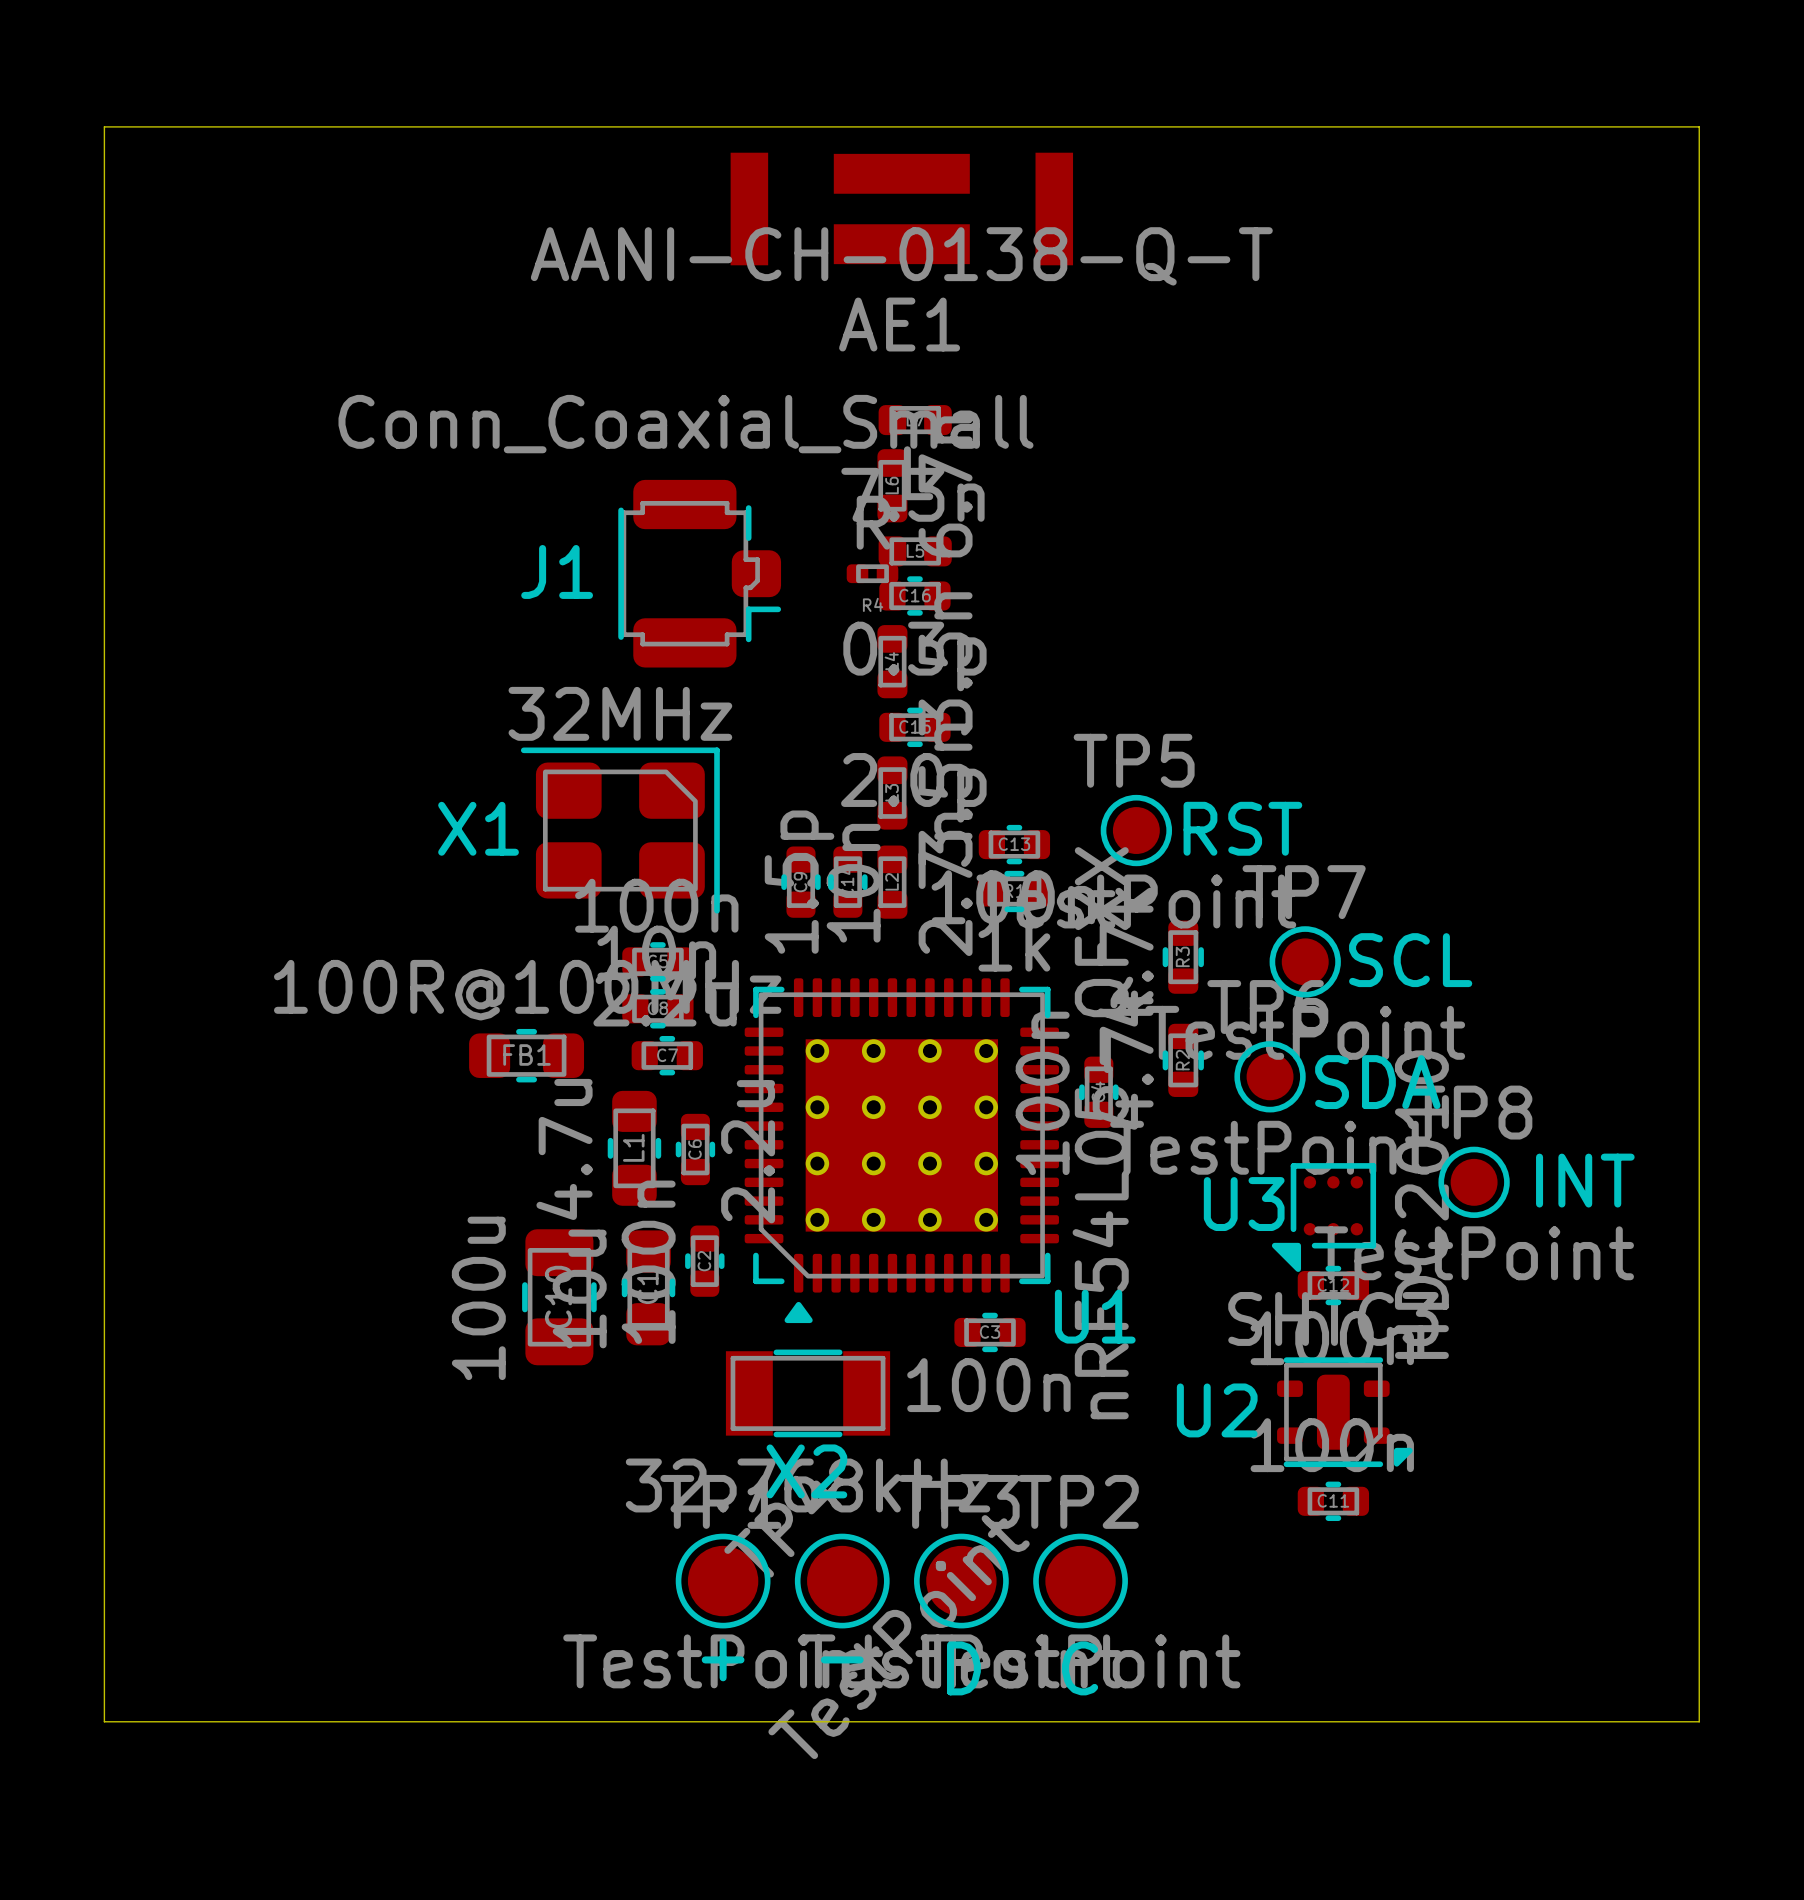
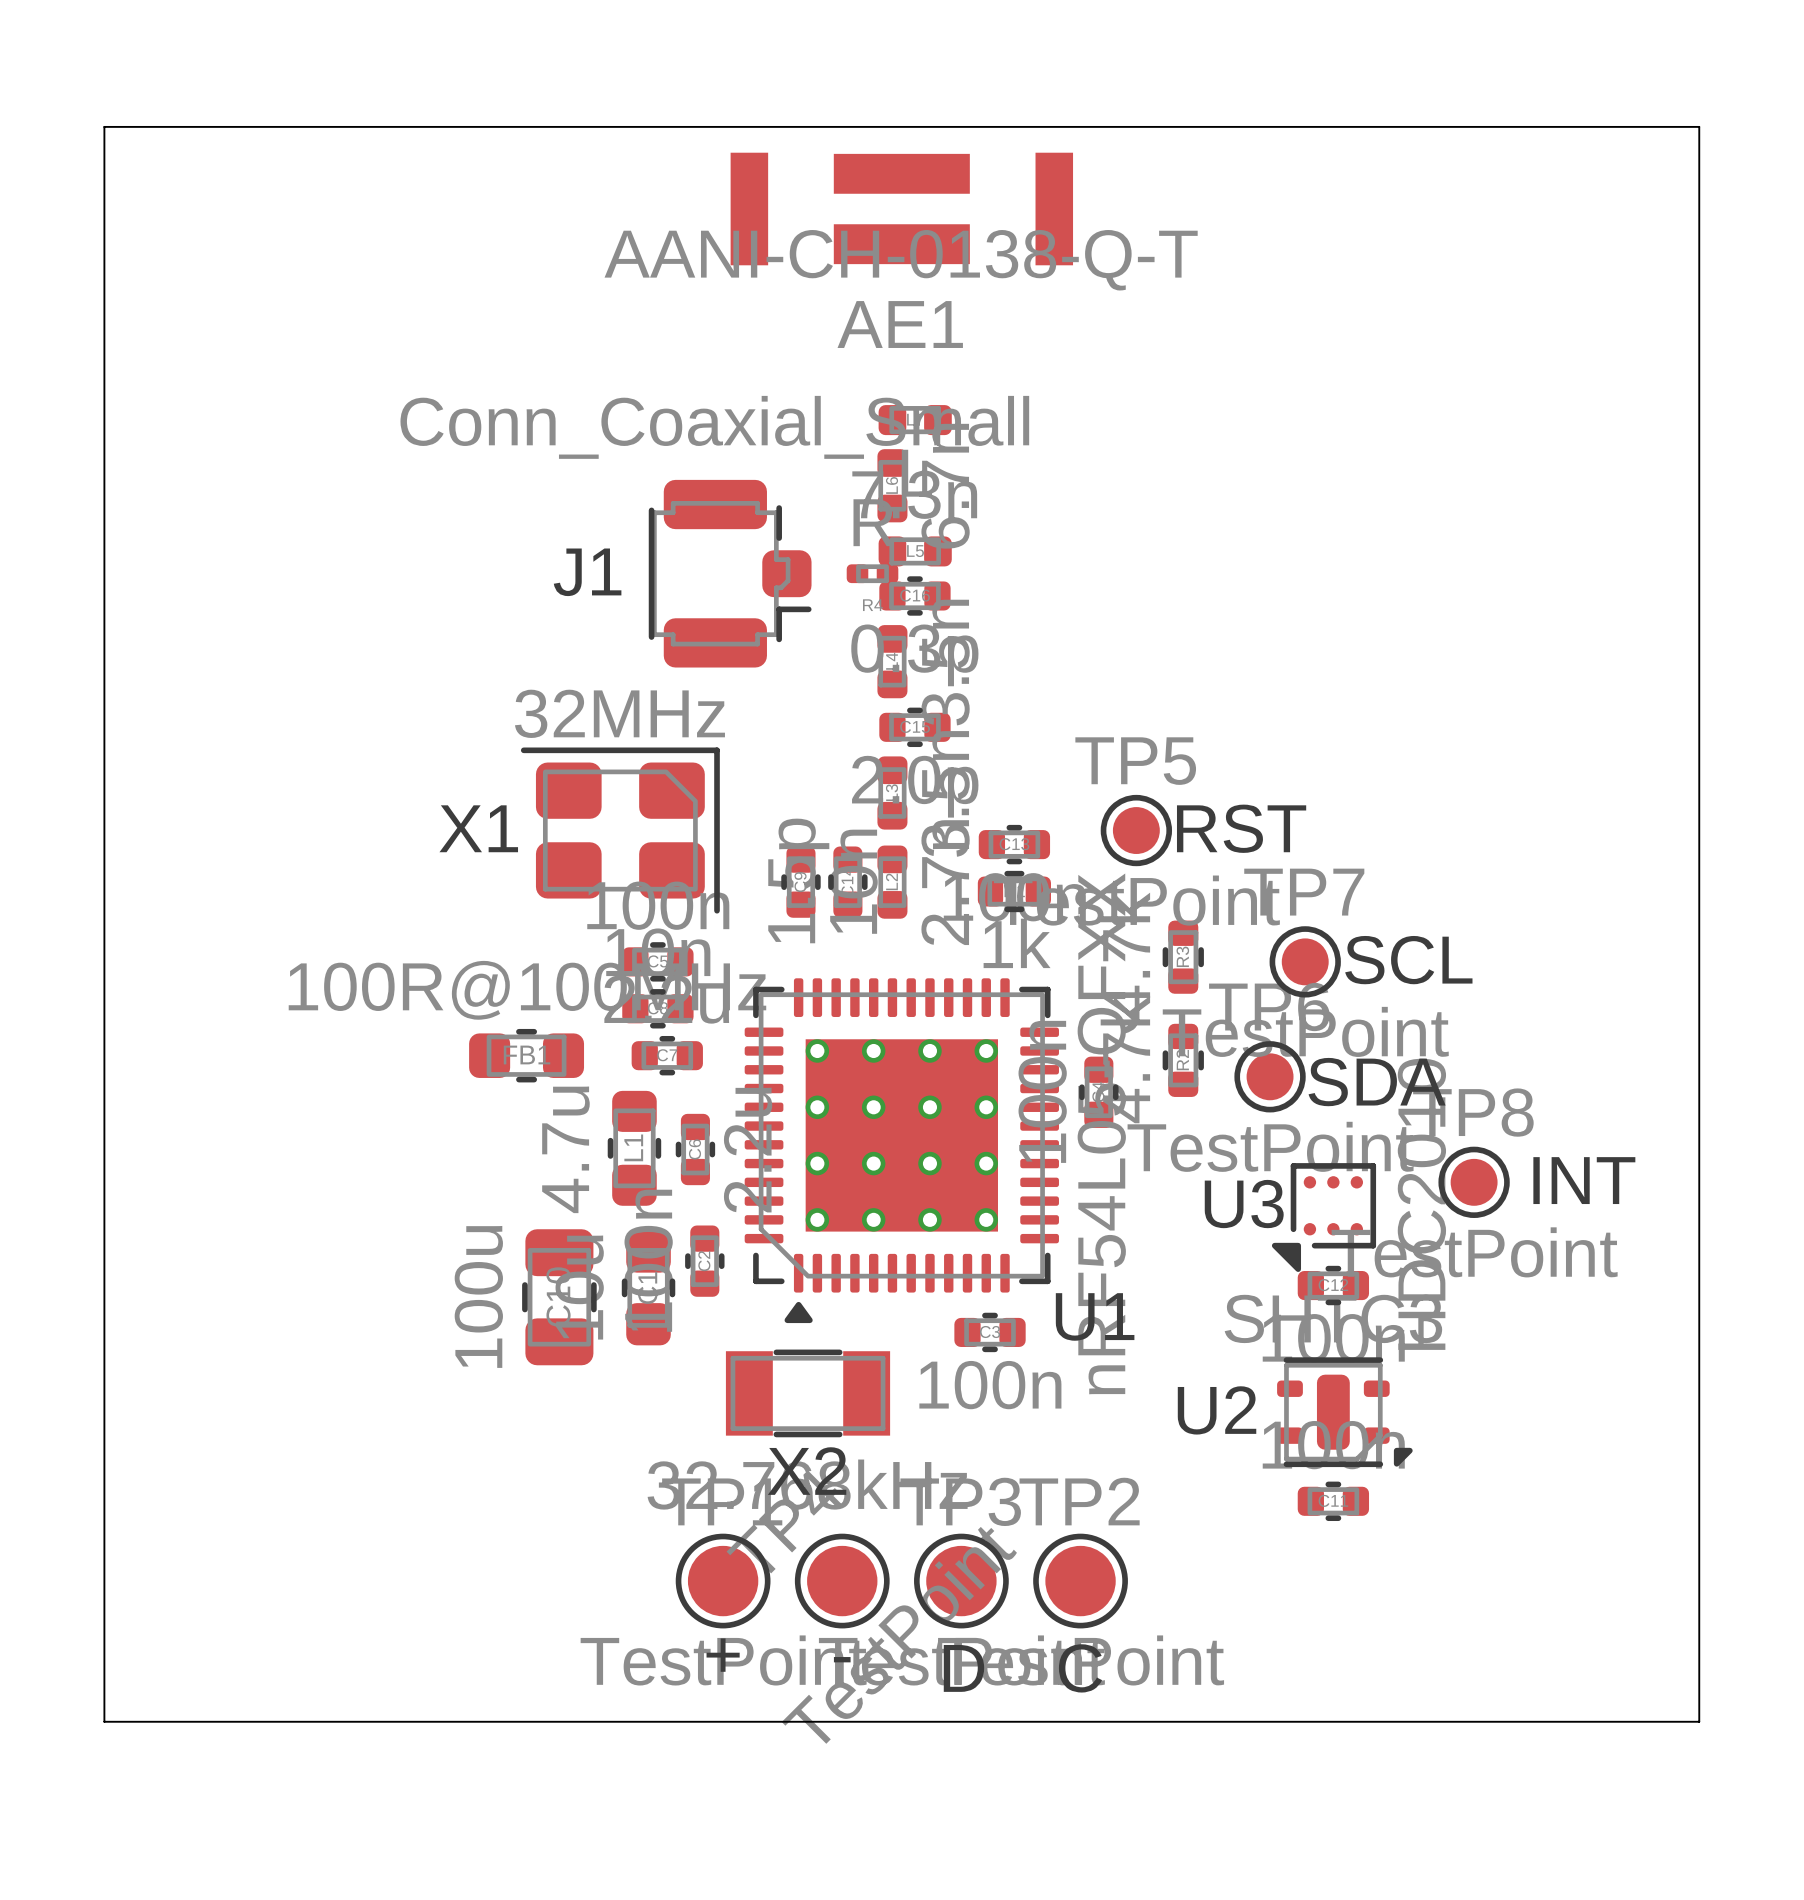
J1 position: (699, 573) -> (730, 573)

